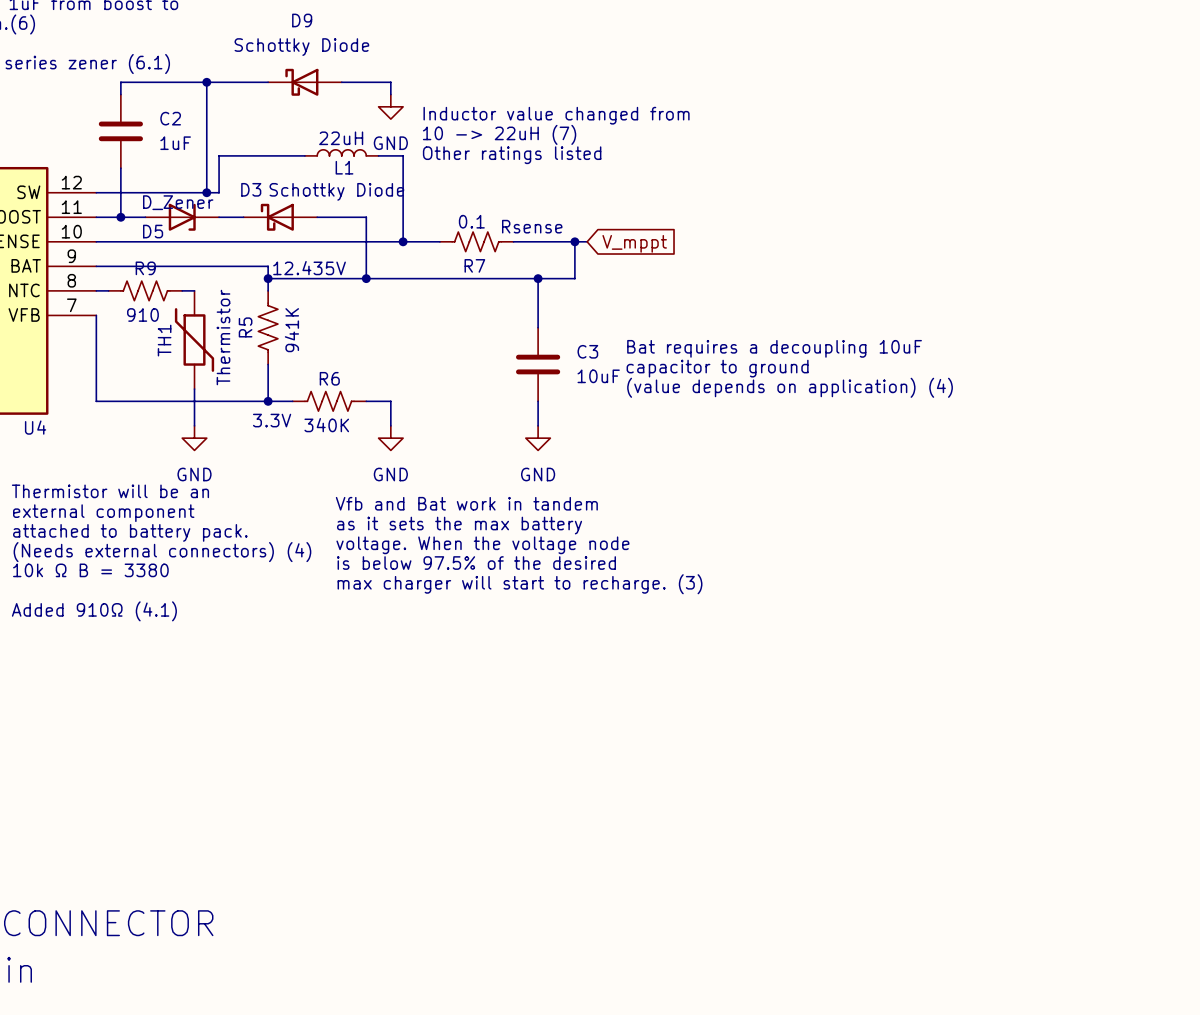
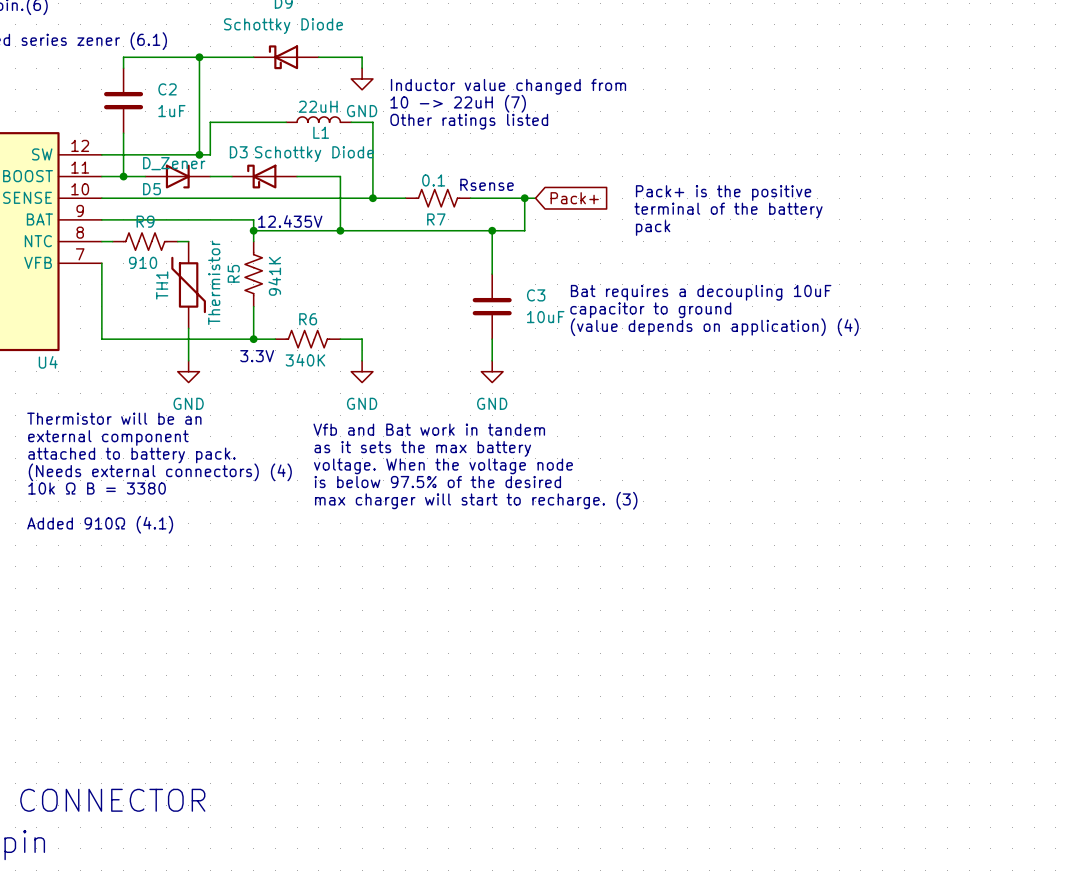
text: none -> Pack+ is the positive (723, 193)
global label: V_mppt (634, 243) -> Pack+ (574, 198)
text: none -> terminal of the battery (728, 210)
text: none -> pack (653, 227)

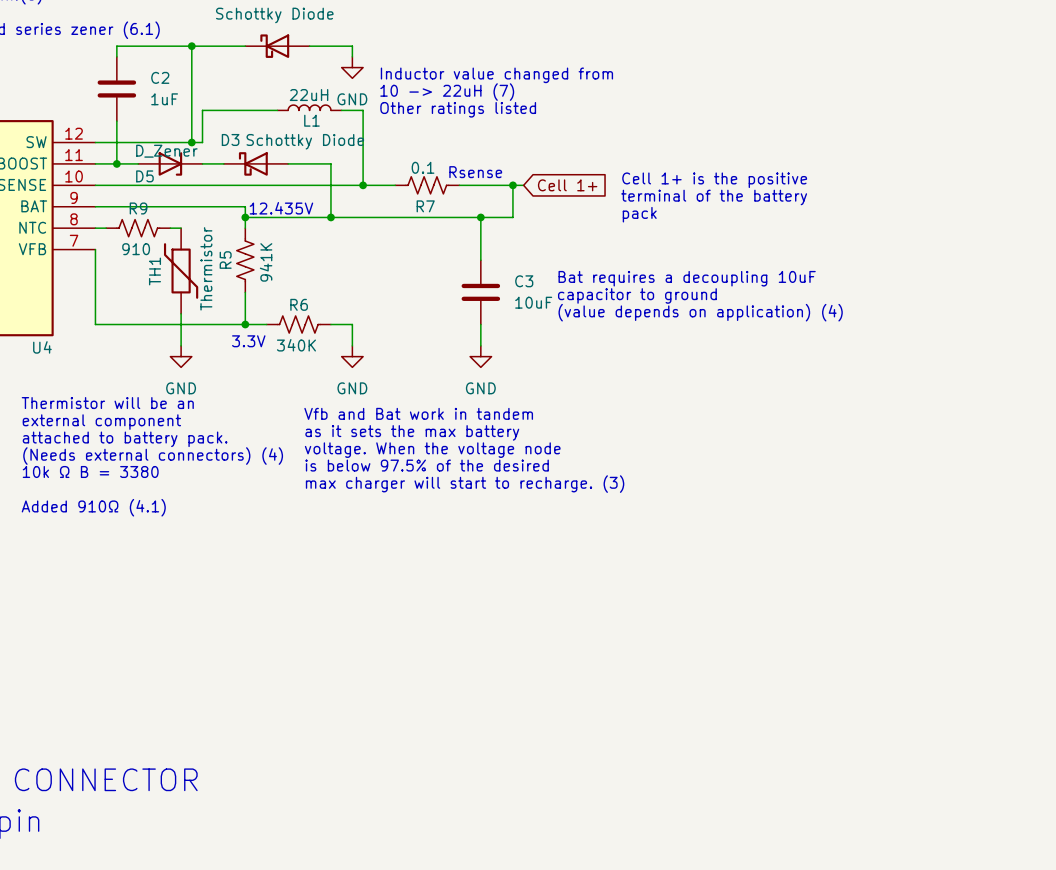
text: Pack+ is the positive (723, 193) -> Cell 1+ is the positive (714, 180)
global label: Pack+ (574, 198) -> Cell 1+ (567, 185)

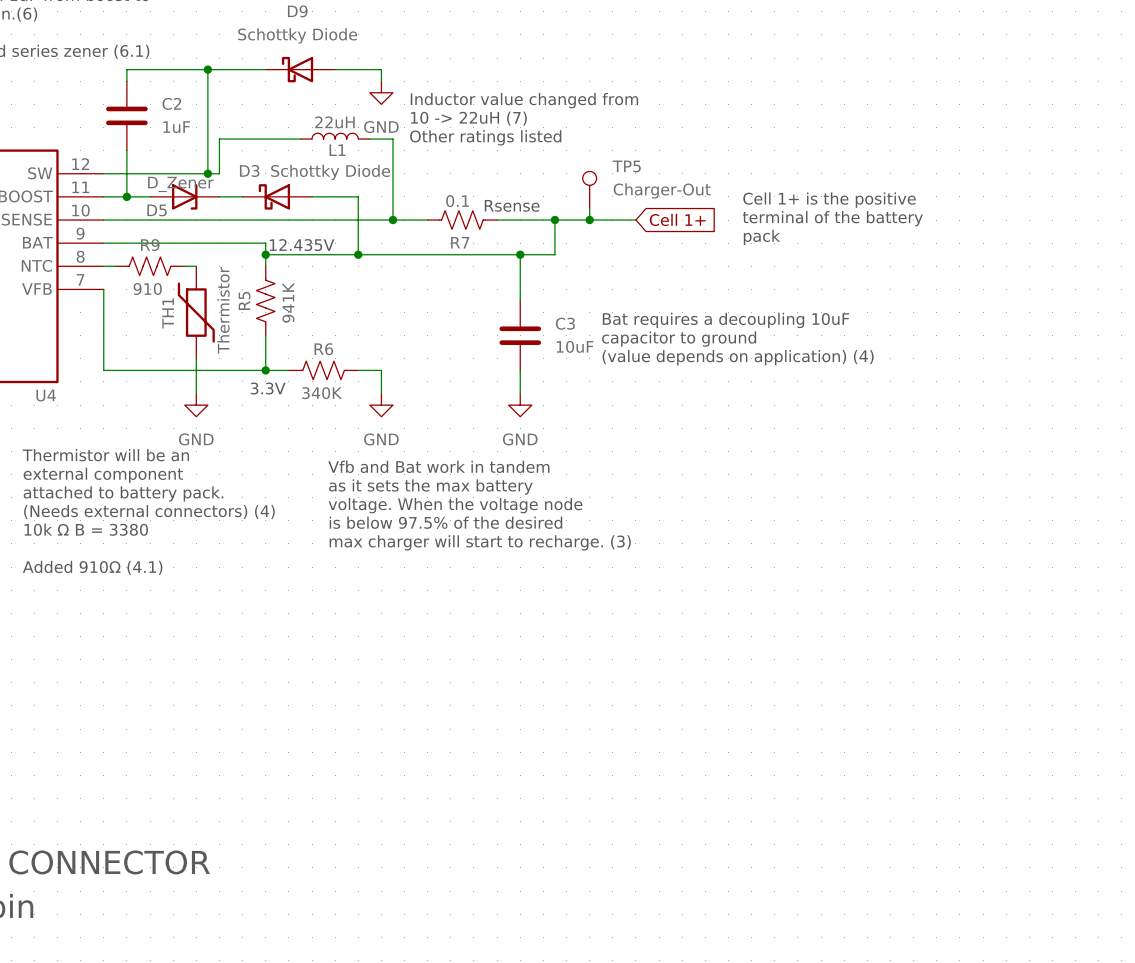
TP5: none -> Charger-Out (589, 189)
wire: none -> (589, 208) (589, 220)
text position: Cell 1+ is the positive (714, 180) -> Cell 1+ is the positive (829, 200)
wire: none -> (566, 220) (635, 220)
junction: none -> (589, 220)
global label position: Cell 1+ (567, 185) -> Cell 1+ (677, 219)
text position: terminal of the battery (714, 197) -> terminal of the battery (832, 218)
text position: pack (639, 214) -> pack (761, 237)

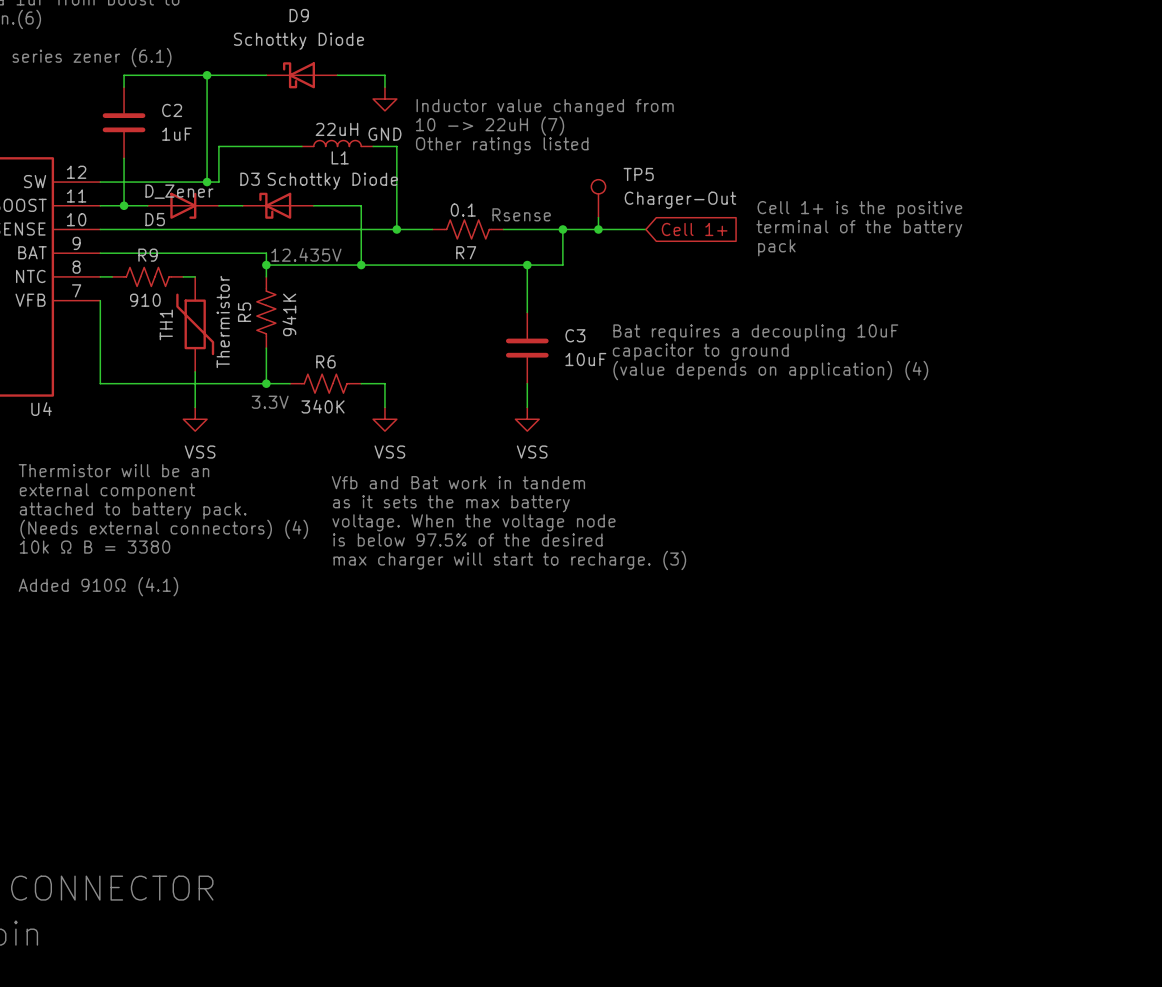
power symbol: GND (196, 405) -> VSS (195, 419)
power symbol: GND (381, 405) -> VSS (384, 419)
power symbol: GND (520, 405) -> VSS (527, 419)

